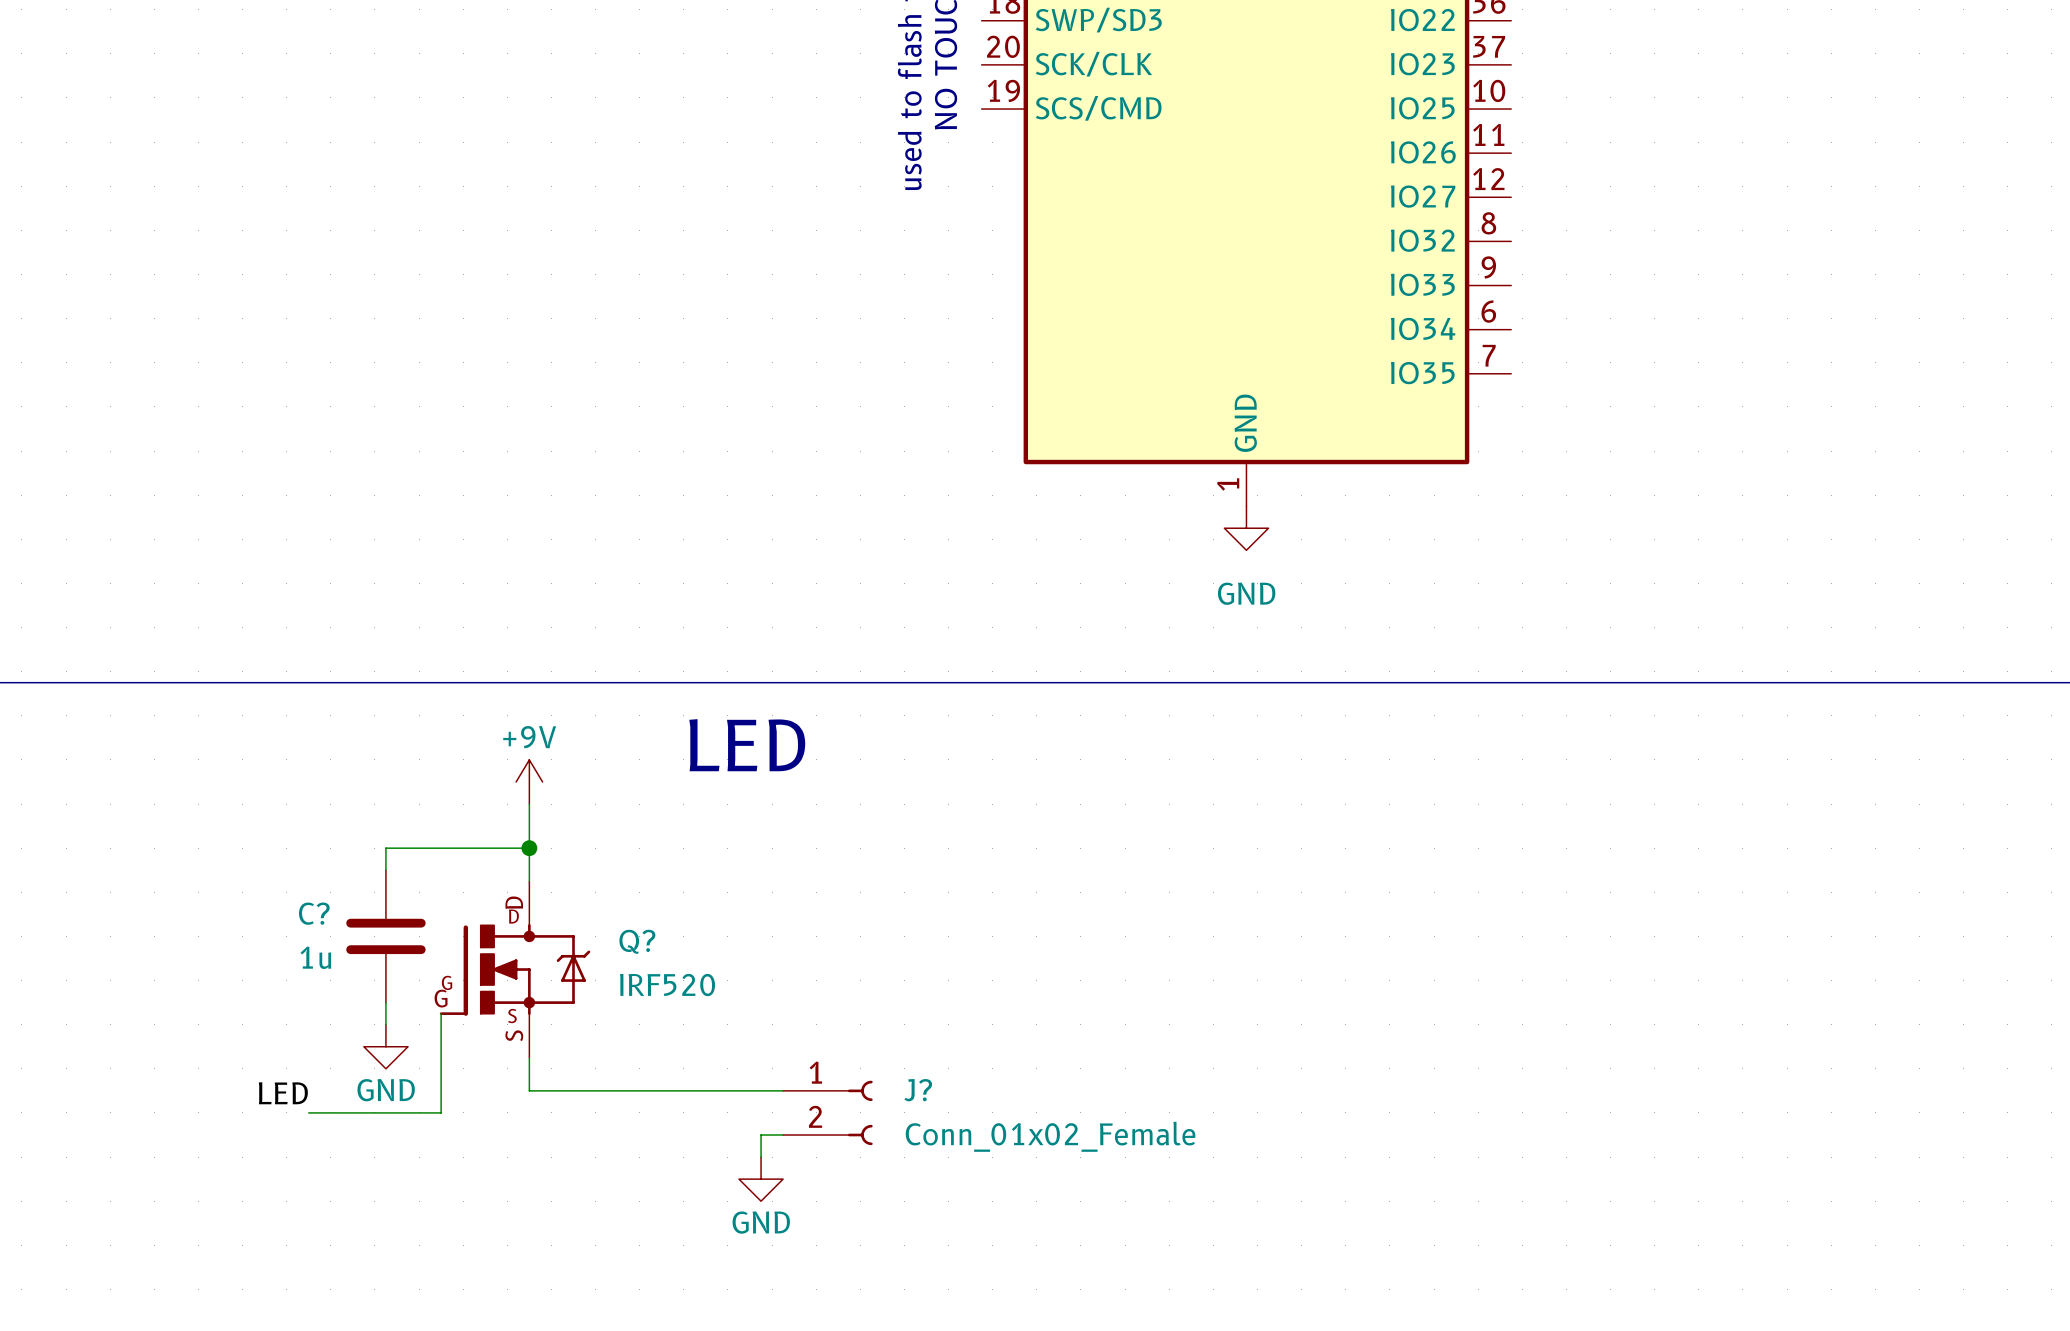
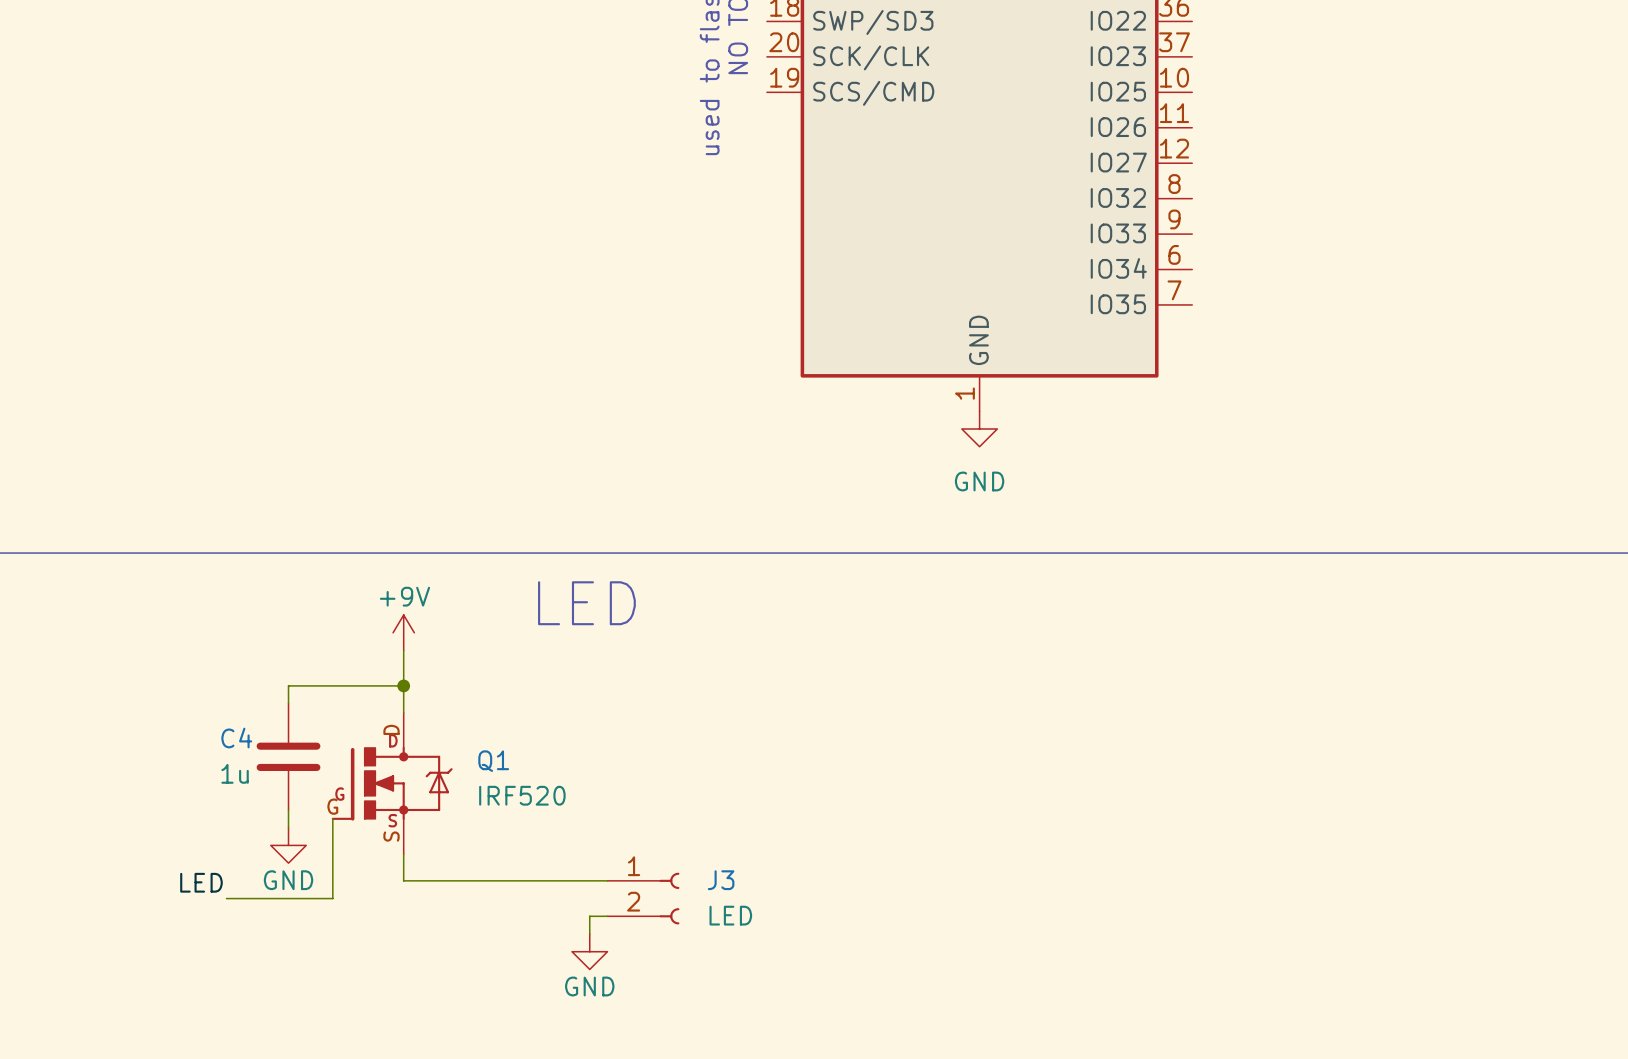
C? name: C? (314, 913) -> C4 (236, 738)
Q? name: Q? (637, 941) -> Q1 (493, 761)
J? name: J? (918, 1090) -> J3 (721, 880)
J? value: Conn_01x02_Female (1050, 1136) -> LED (730, 915)

